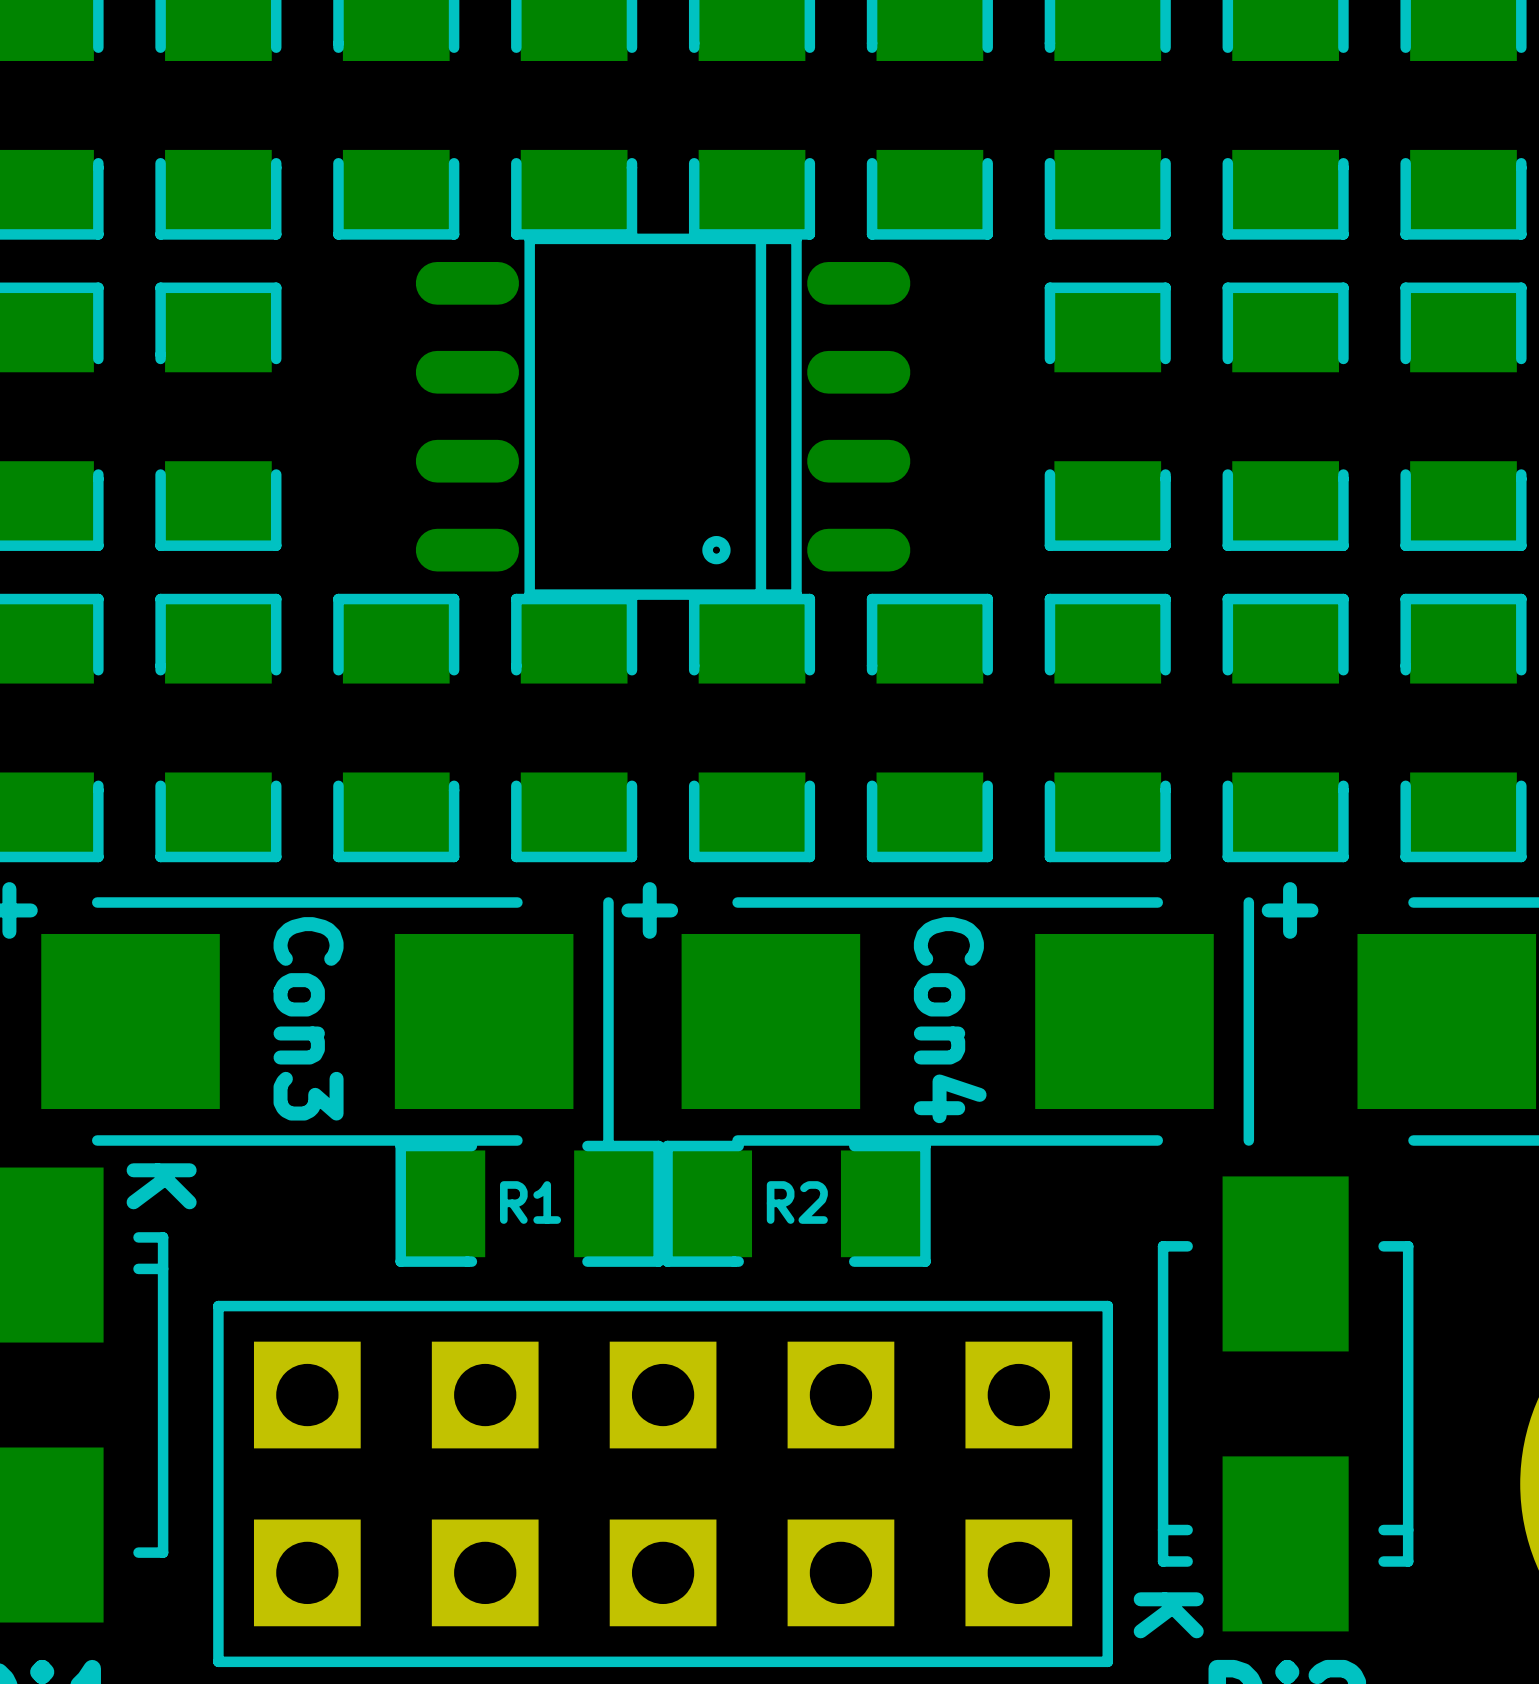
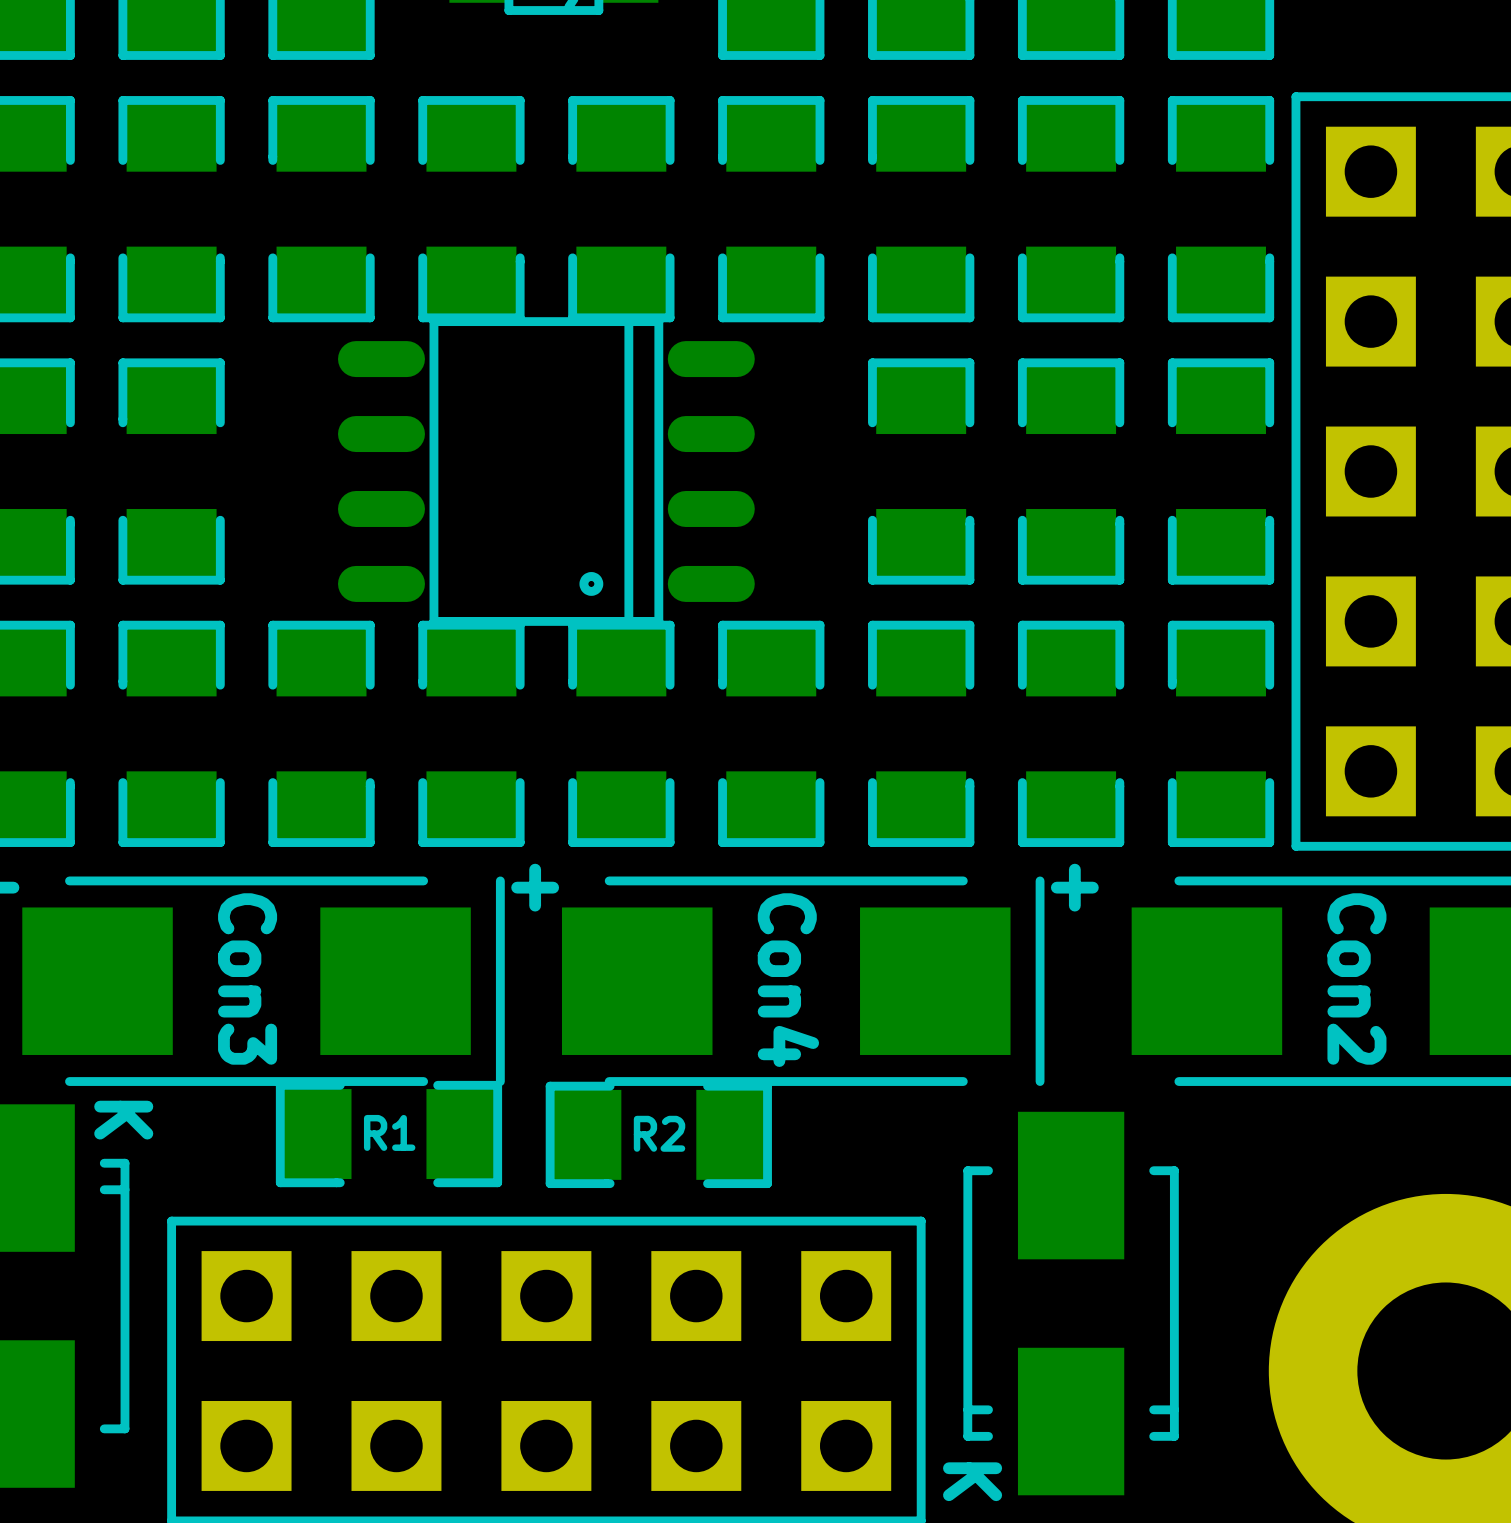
R1 position: (529, 1203) -> (388, 1134)

